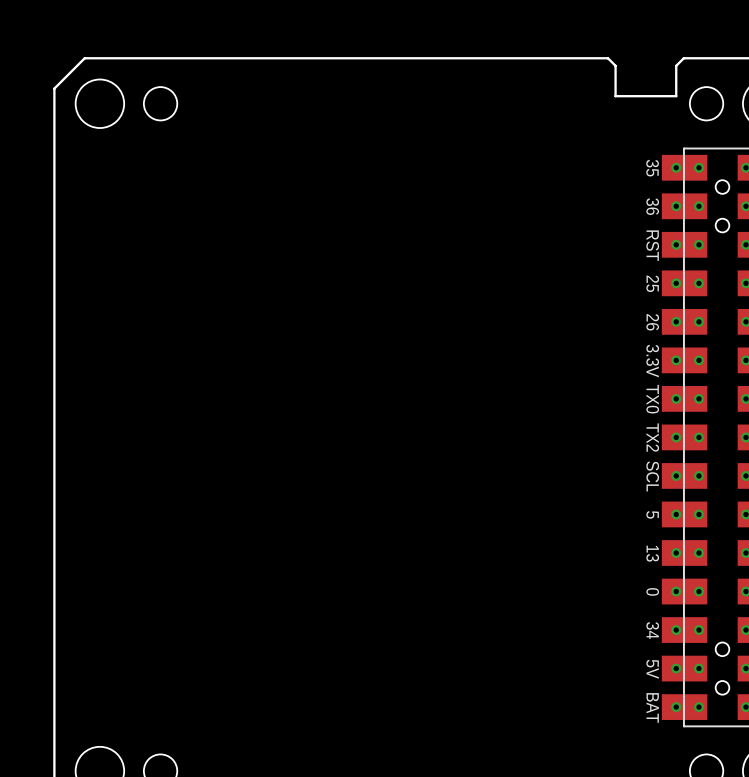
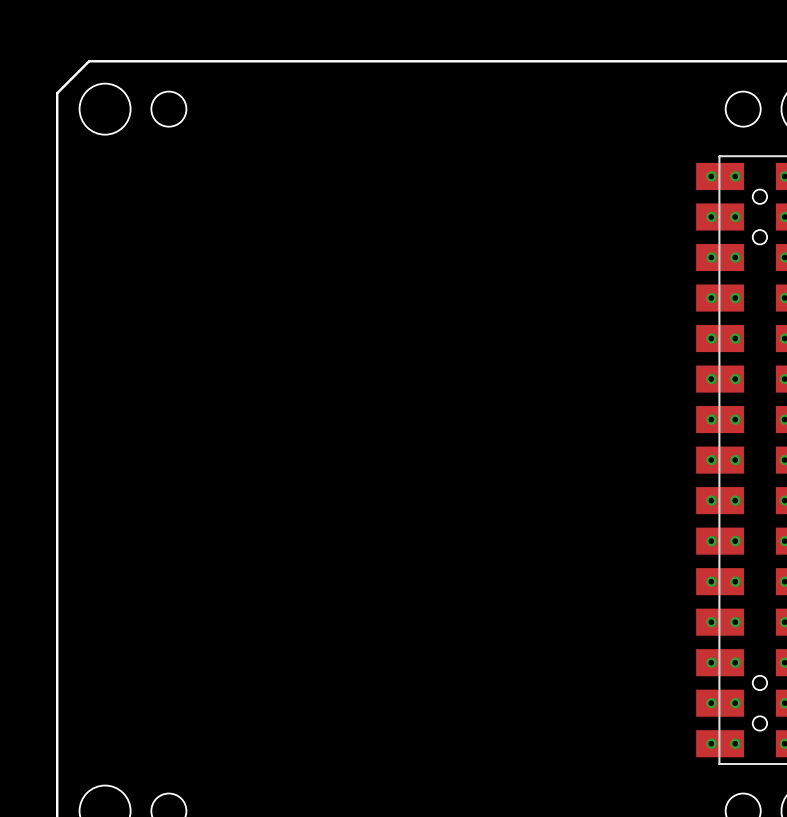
board edge: (607, 58) (615, 65) (615, 96) (676, 96) (676, 65) (683, 58) -> (639, 61) (719, 61)
text: 35 (652, 168) -> none
text: 36 (652, 206) -> none
text: RST (652, 245) -> none
text: 25 (652, 283) -> none
text: 26 (652, 322) -> none
text: 3.3V (652, 361) -> none
text: TX0 (652, 399) -> none
text: TX2 (652, 437) -> none
text: SCL (652, 476) -> none
text: 5 (652, 514) -> none
text: 13 (652, 553) -> none
text: 0 (652, 591) -> none
text: 34 (652, 630) -> none
text: 5V (652, 669) -> none
text: BAT (652, 707) -> none

